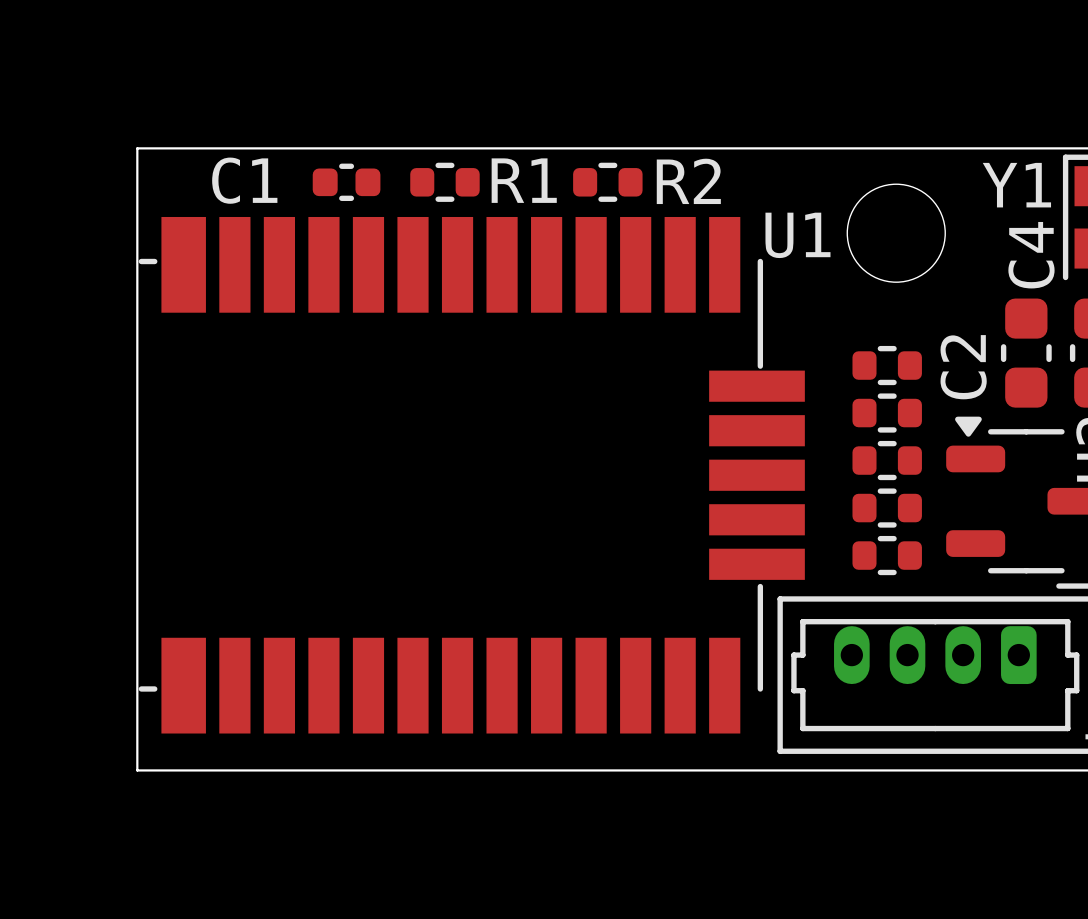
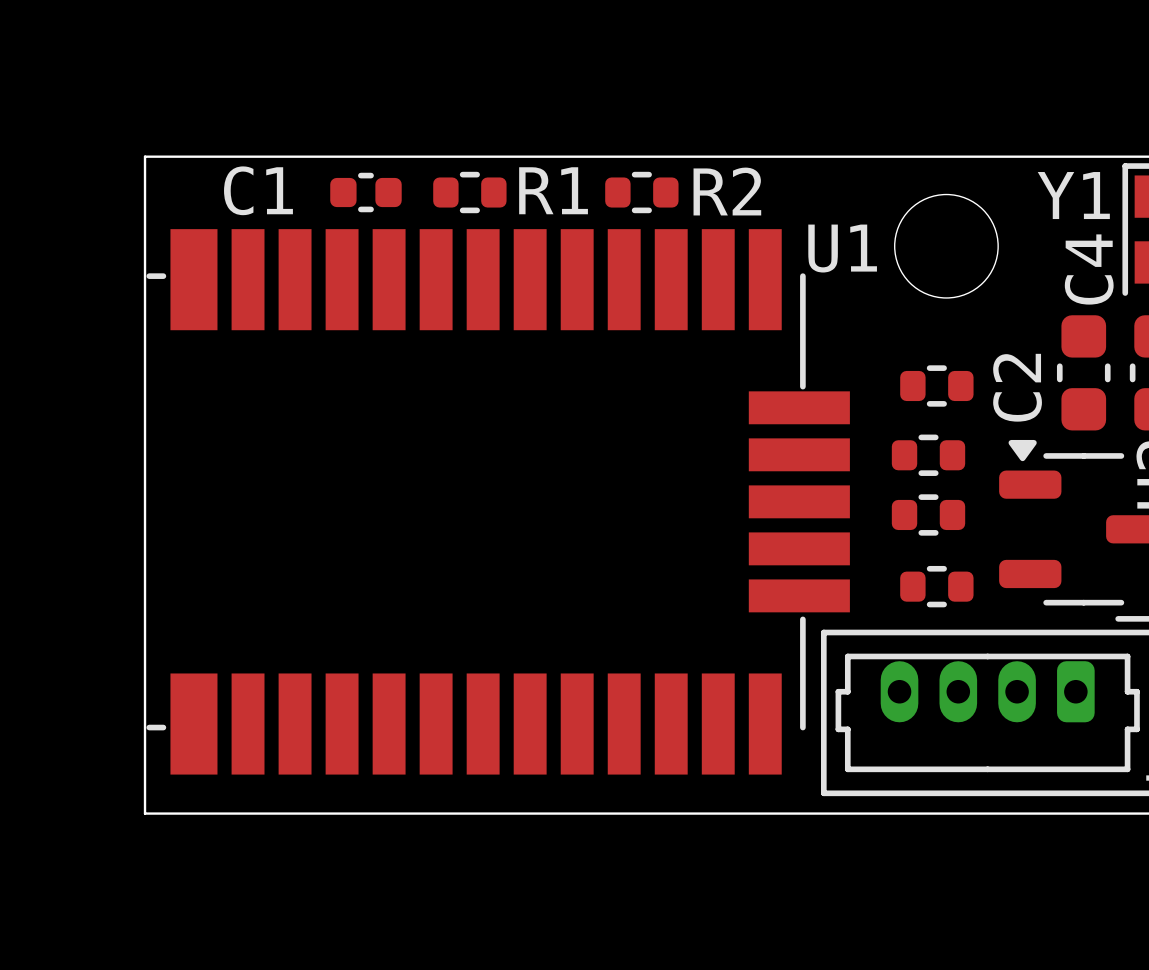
part: (887, 413) -> none
part: none -> (928, 455)
part: (887, 460) -> none
part: none -> (928, 514)
part: (887, 508) -> none

